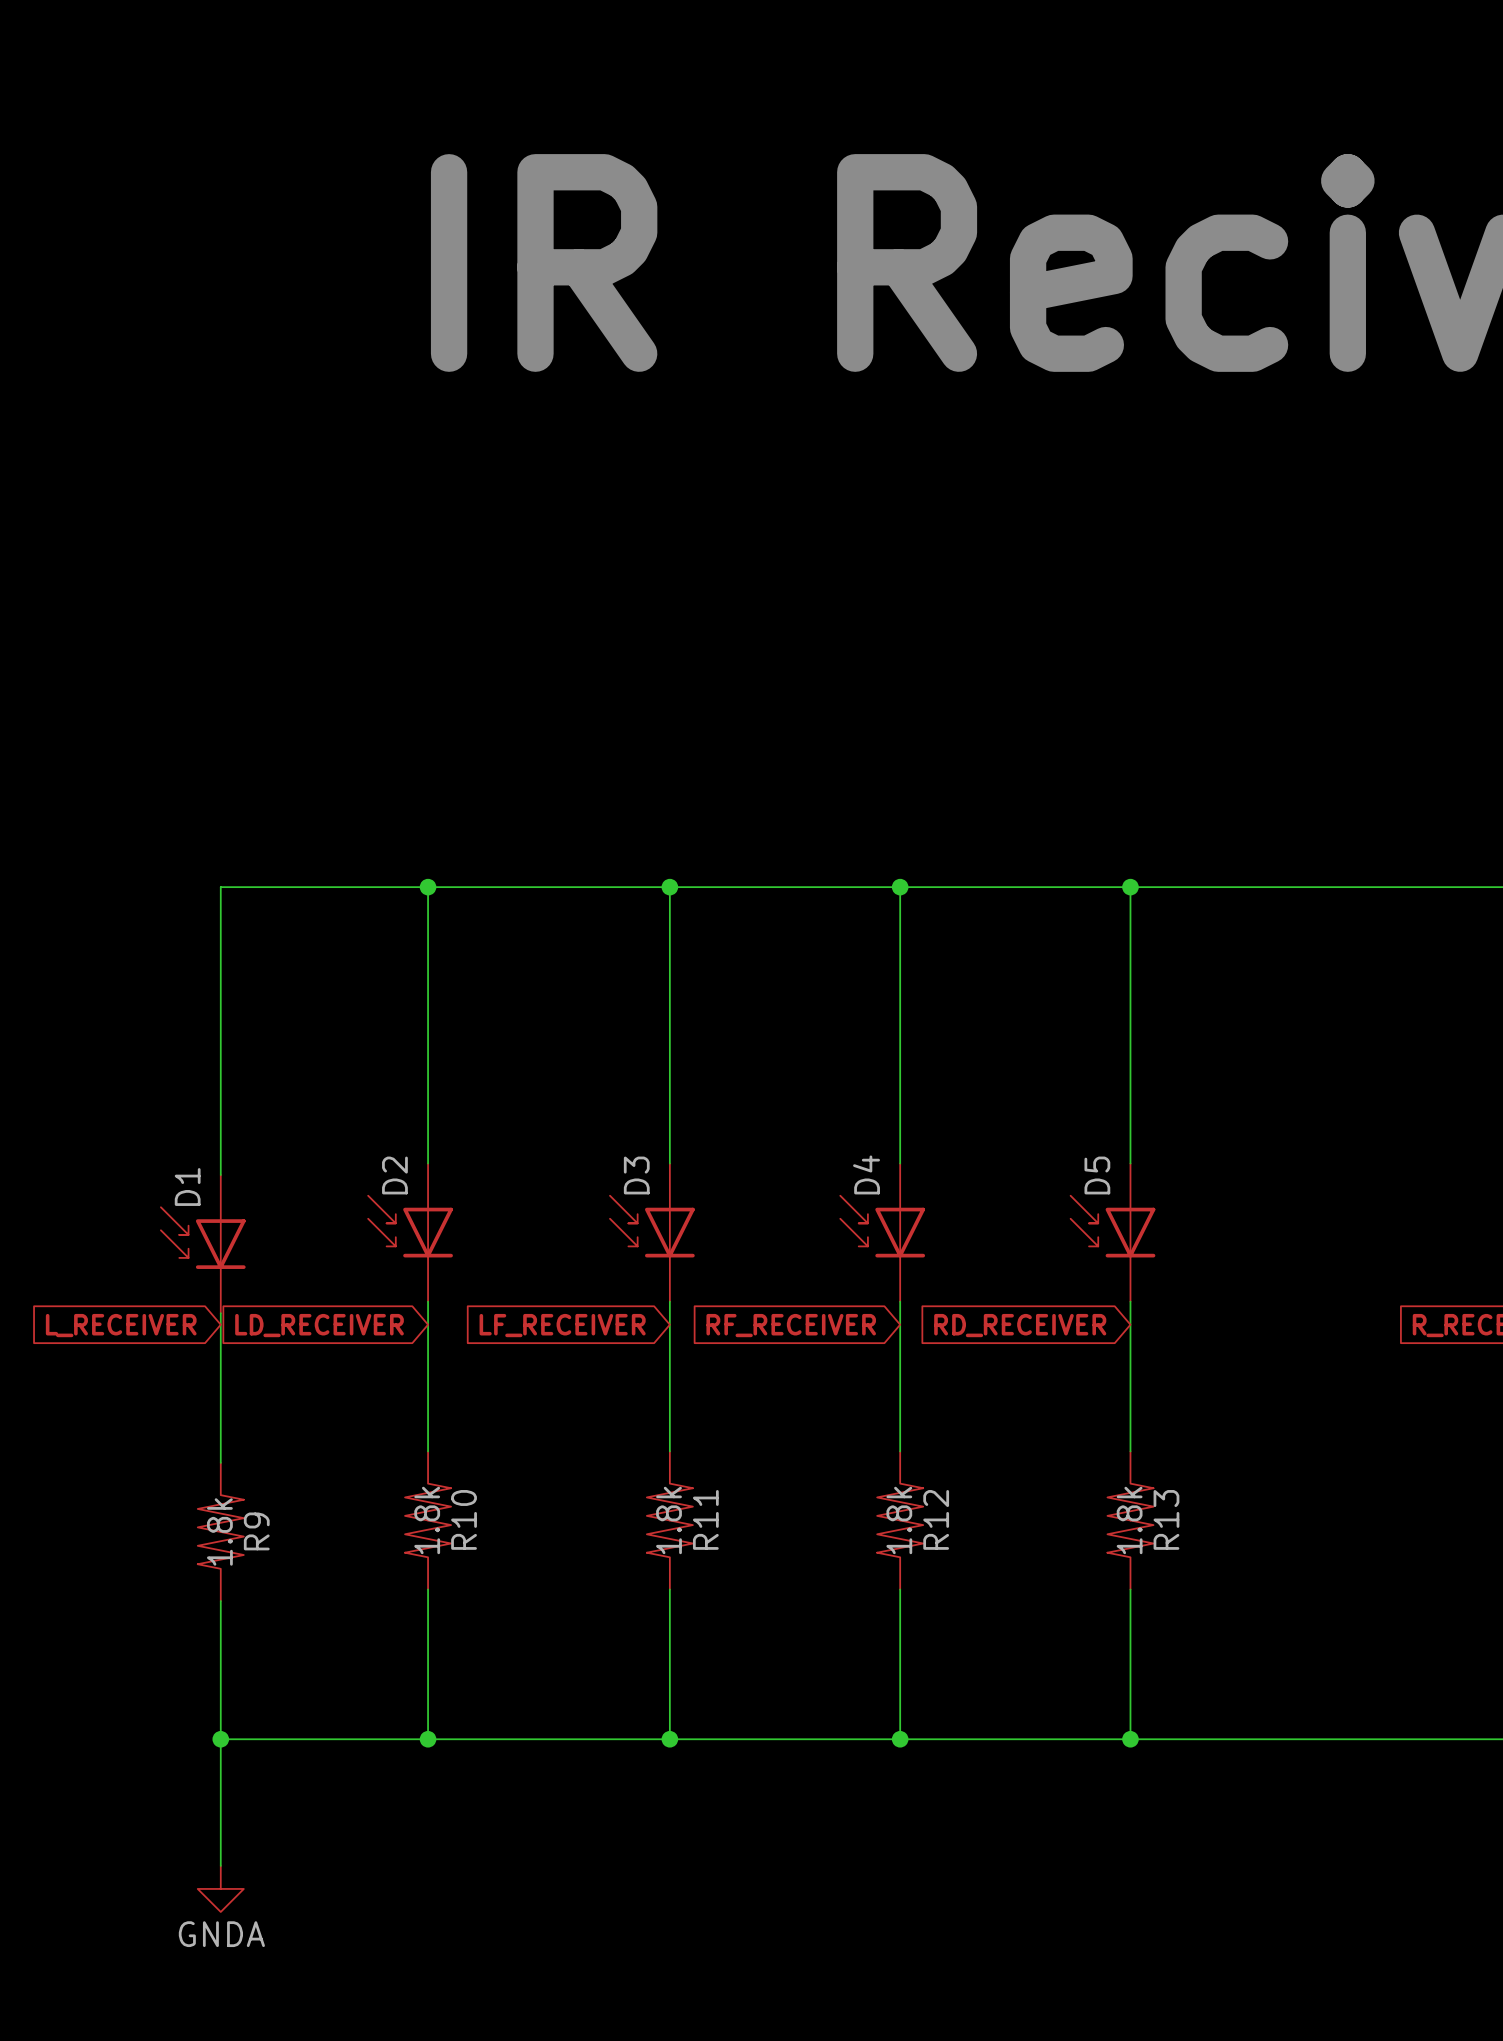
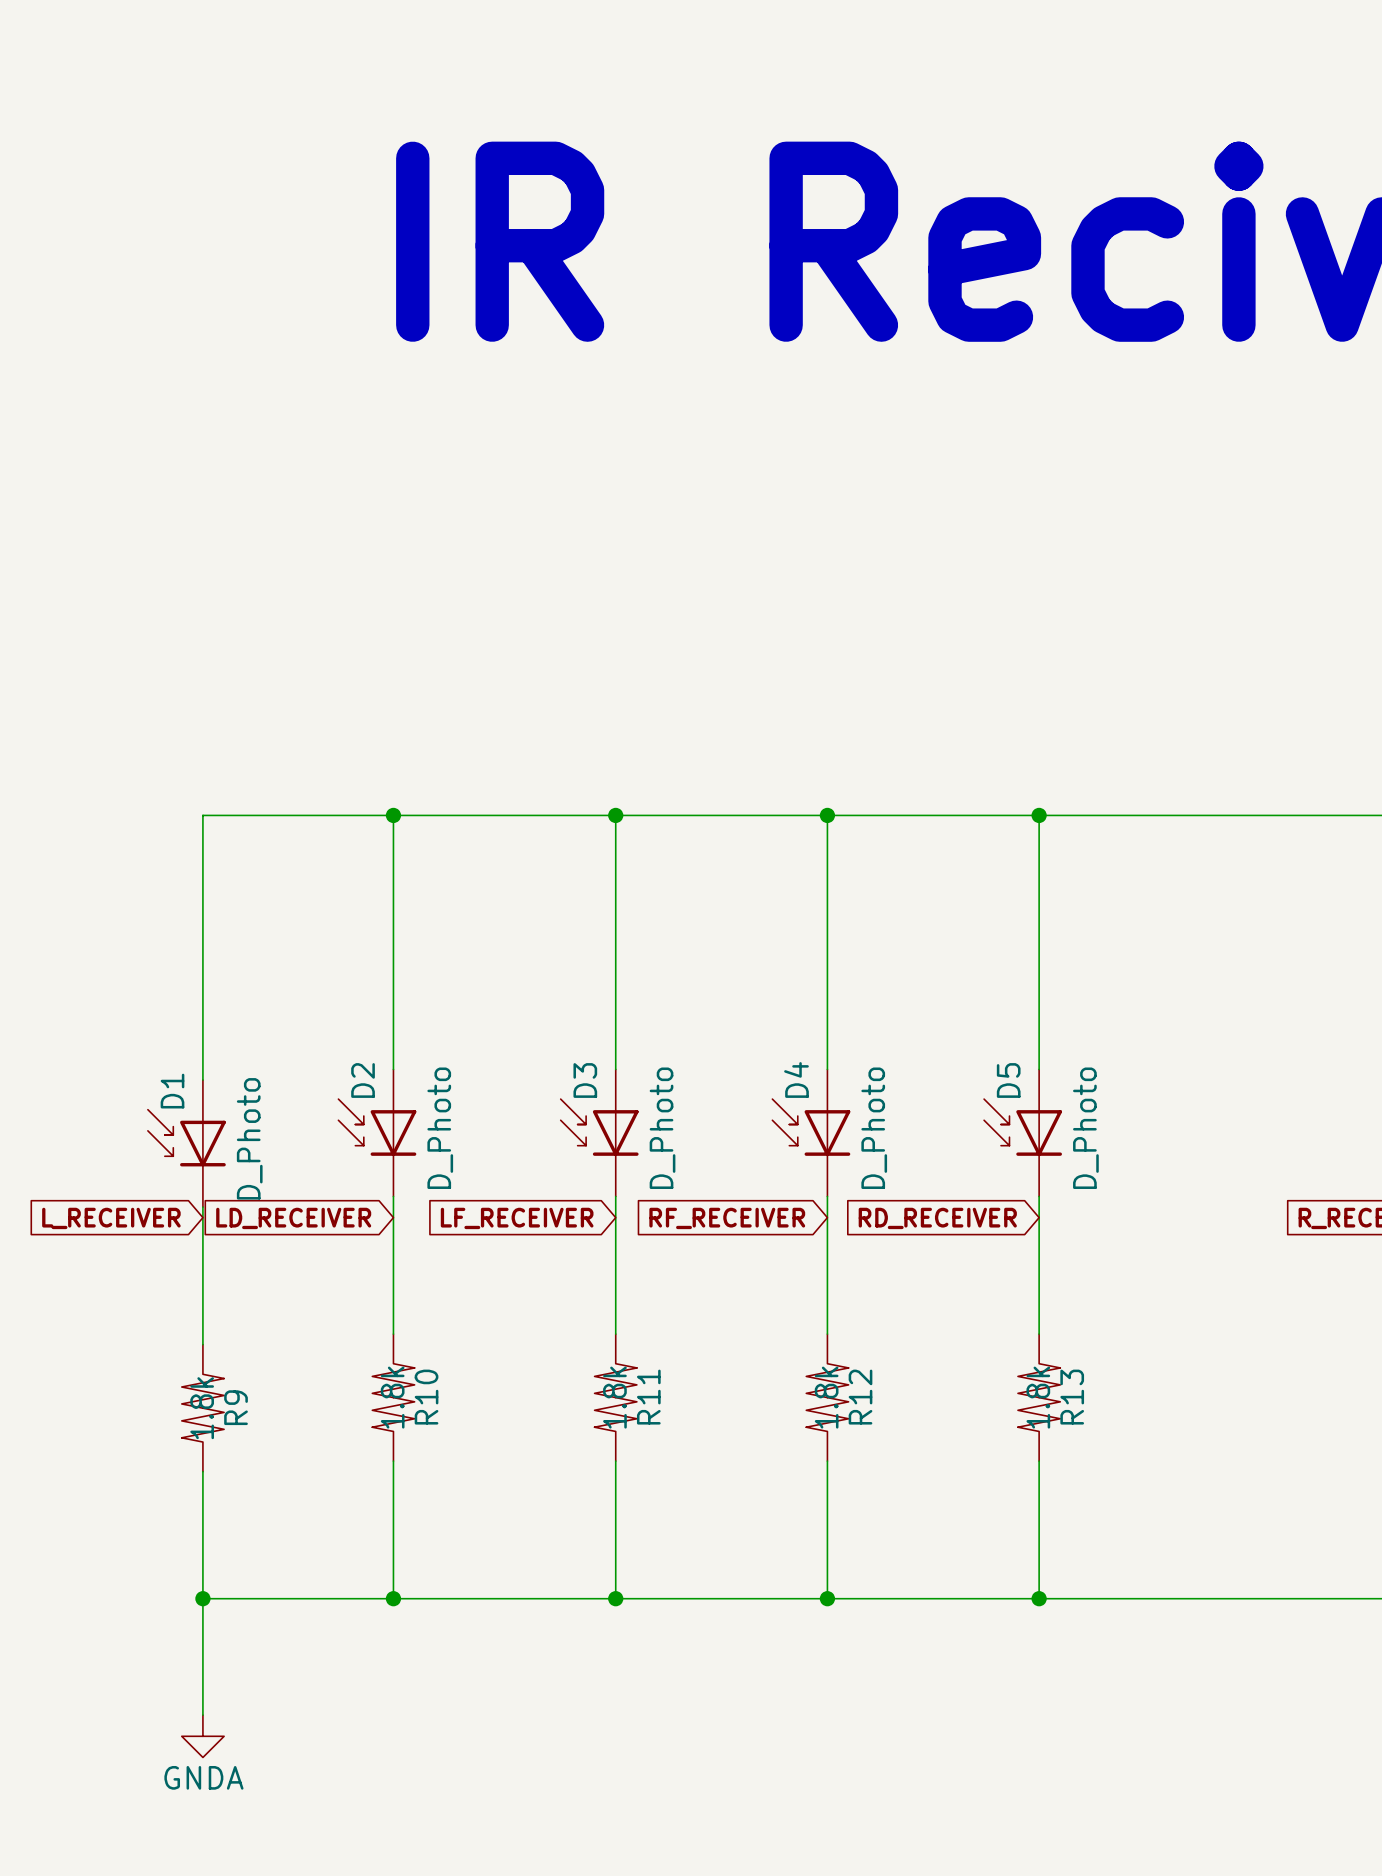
D2 value: none -> D_Photo (440, 1128)
D3 value: none -> D_Photo (662, 1128)
D4 value: none -> D_Photo (874, 1128)
D5 value: none -> D_Photo (1085, 1128)
D1 value: none -> D_Photo (249, 1138)

